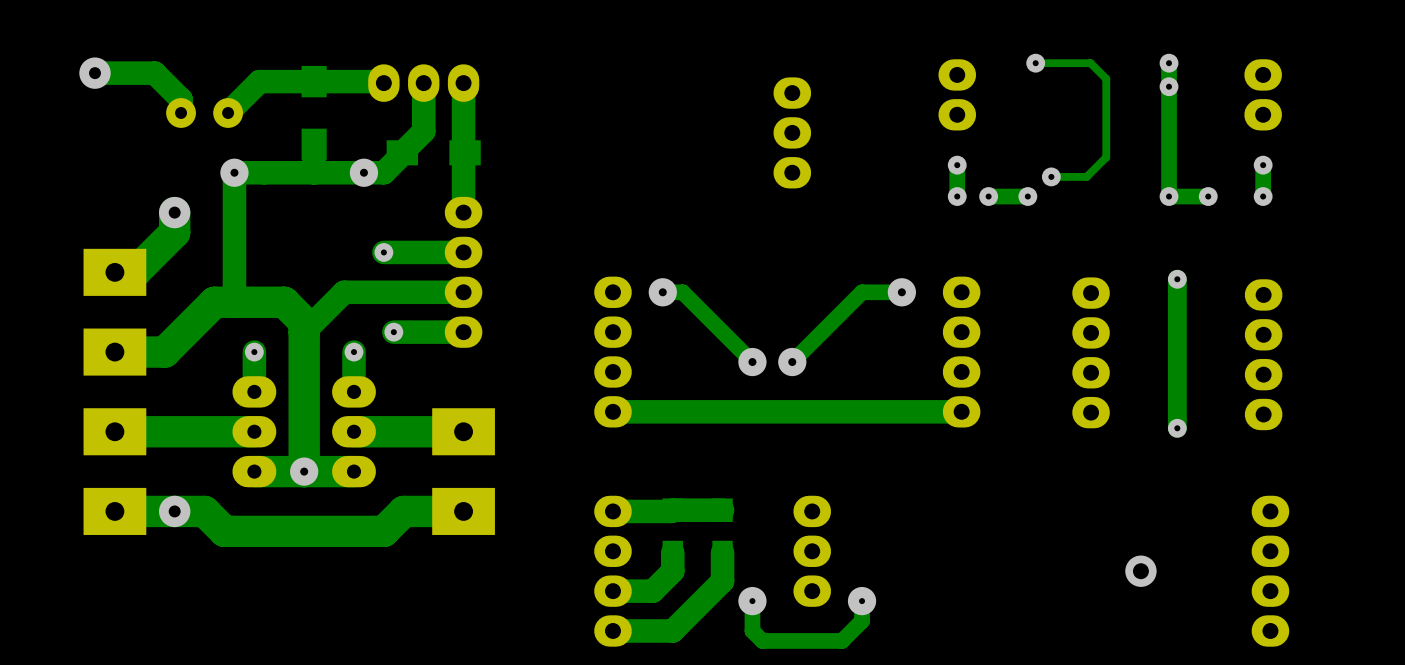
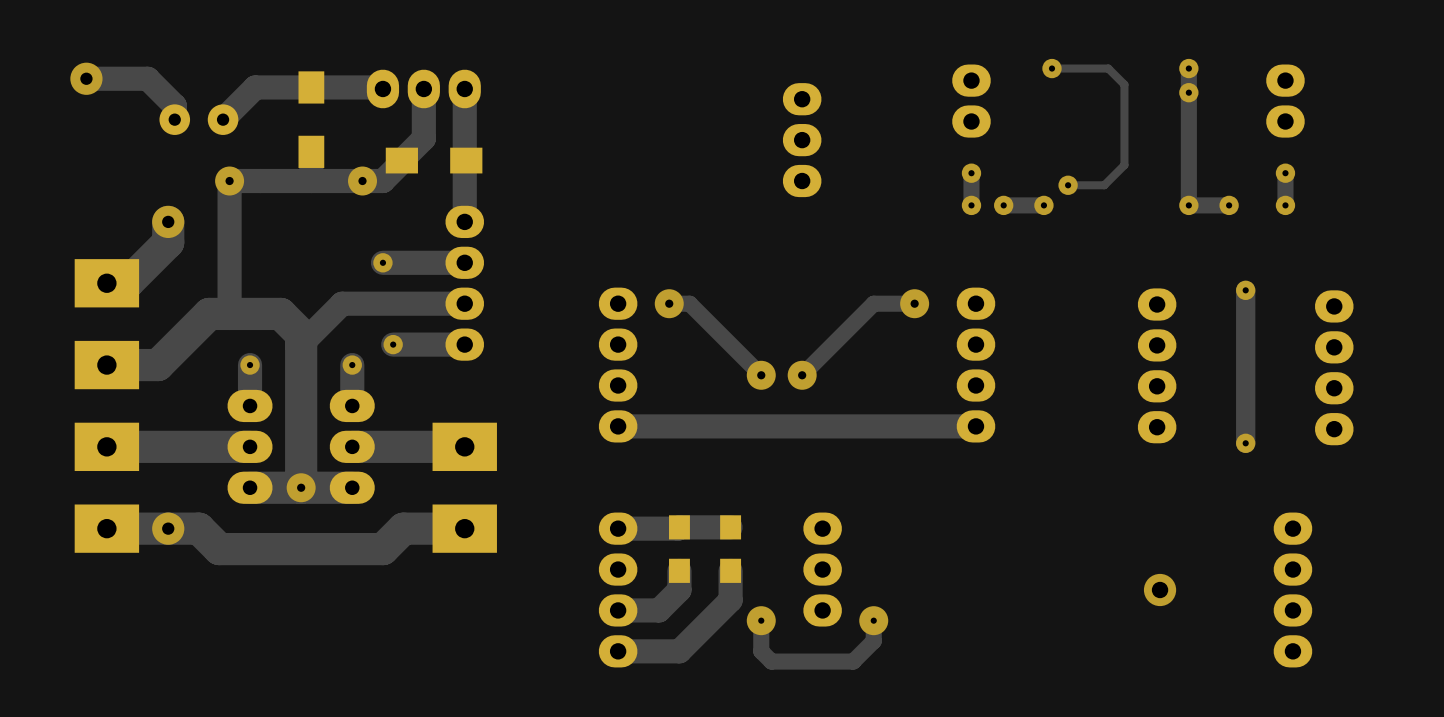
track: (1177, 279) (1177, 428) -> (1245, 290) (1245, 443)
via position: (1177, 279) -> (1245, 290)
part position: (1091, 352) -> (1157, 365)
part position: (1263, 354) -> (1334, 367)
via position: (1177, 428) -> (1245, 443)

